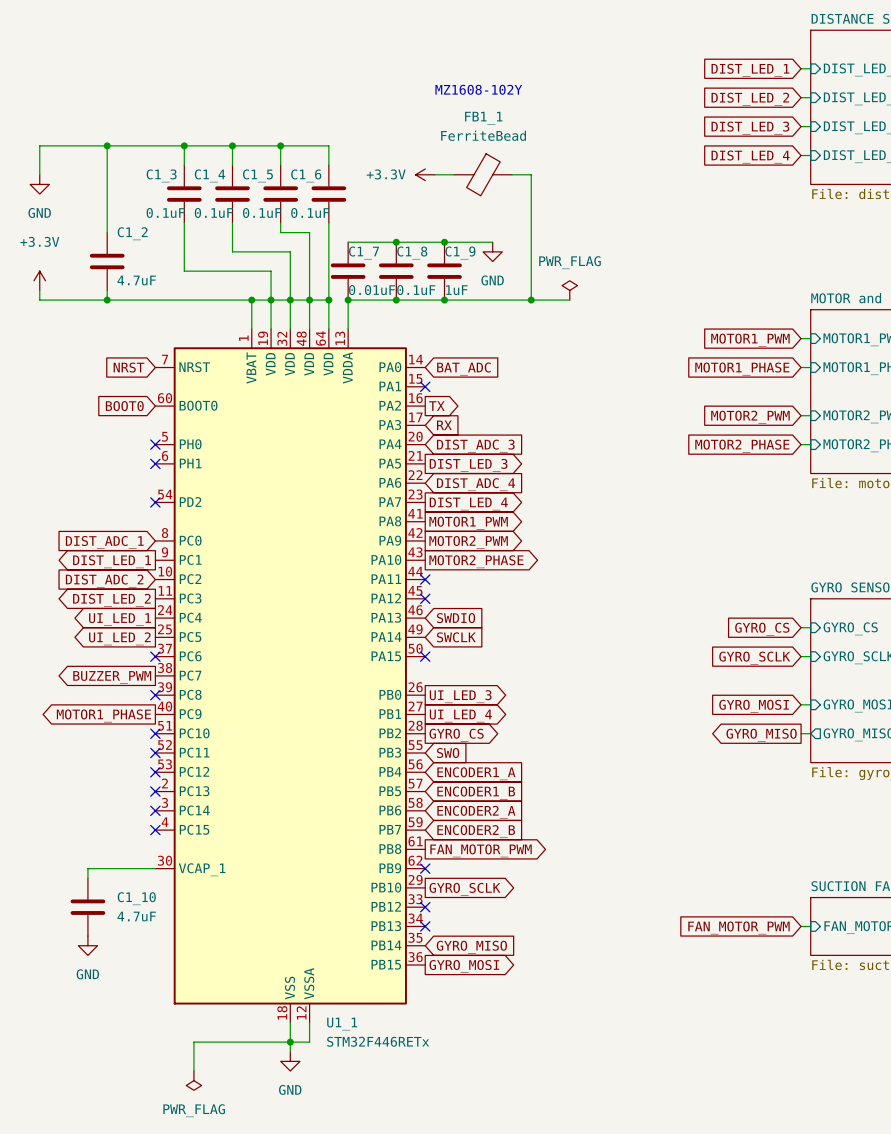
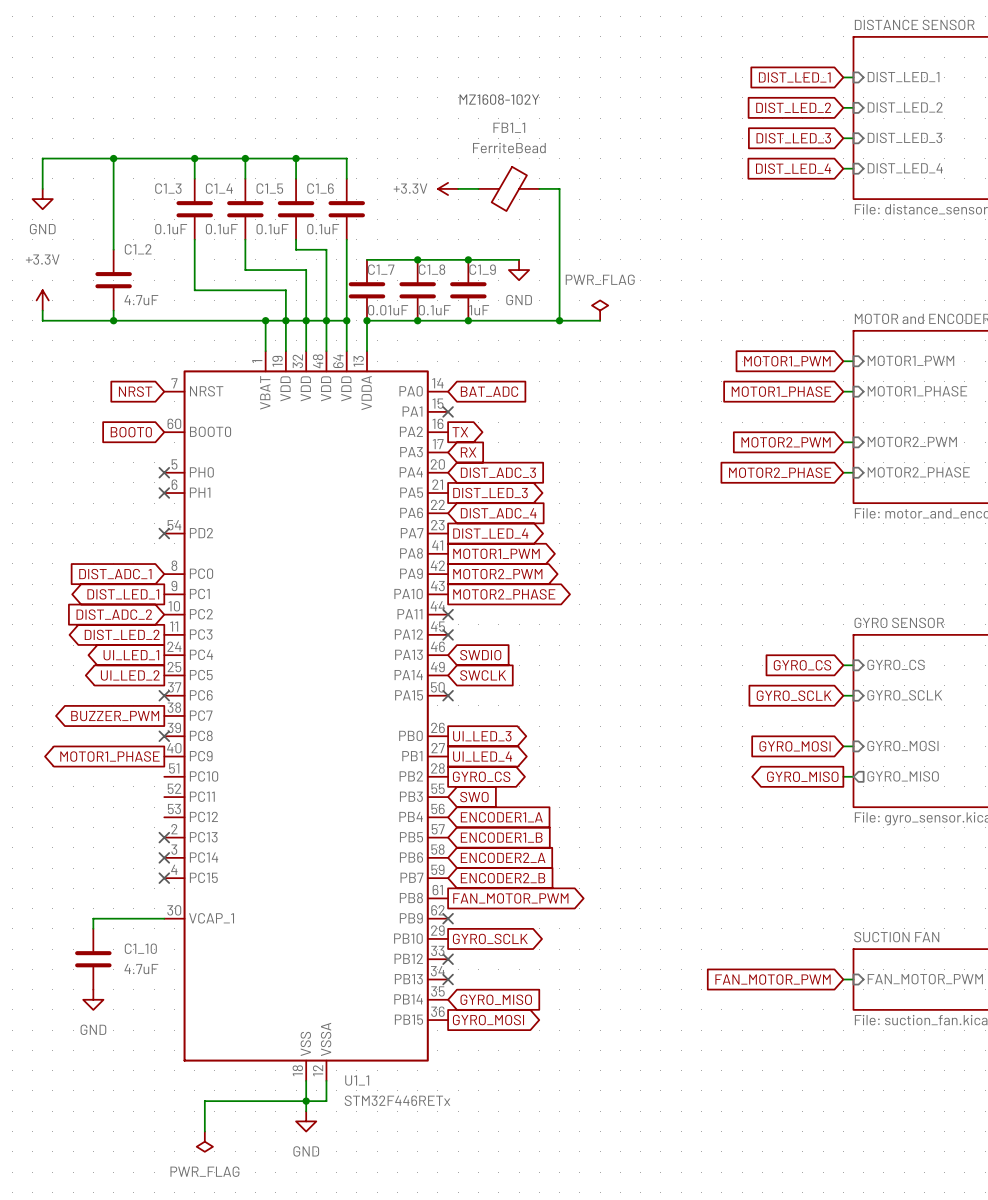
no-connect mark: (155, 733) -> none
no-connect mark: (155, 753) -> none
no-connect mark: (155, 772) -> none

